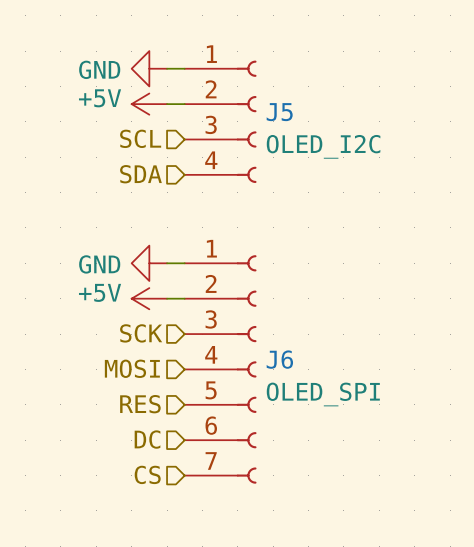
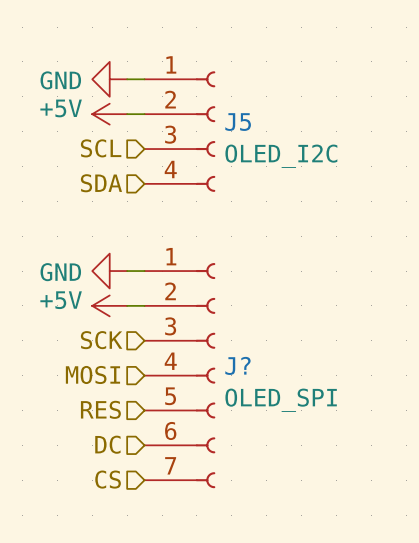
J6 name: J6 (279, 359) -> J? (237, 365)

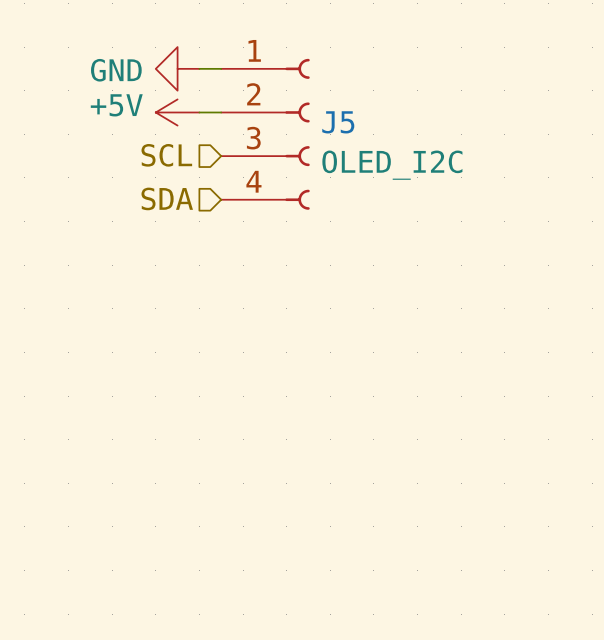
power symbol: GND (109, 271) -> none
wire: (127, 271) (144, 271) -> none
power symbol: +5V (109, 305) -> none
wire: (127, 305) (144, 305) -> none
hierarchical label: SCK (101, 340) -> none
hierarchical label: MOSI (92, 374) -> none
J?: OLED_SPI (179, 375) -> none
hierarchical label: RES (100, 409) -> none
hierarchical label: DC (107, 444) -> none
hierarchical label: CS (108, 479) -> none

